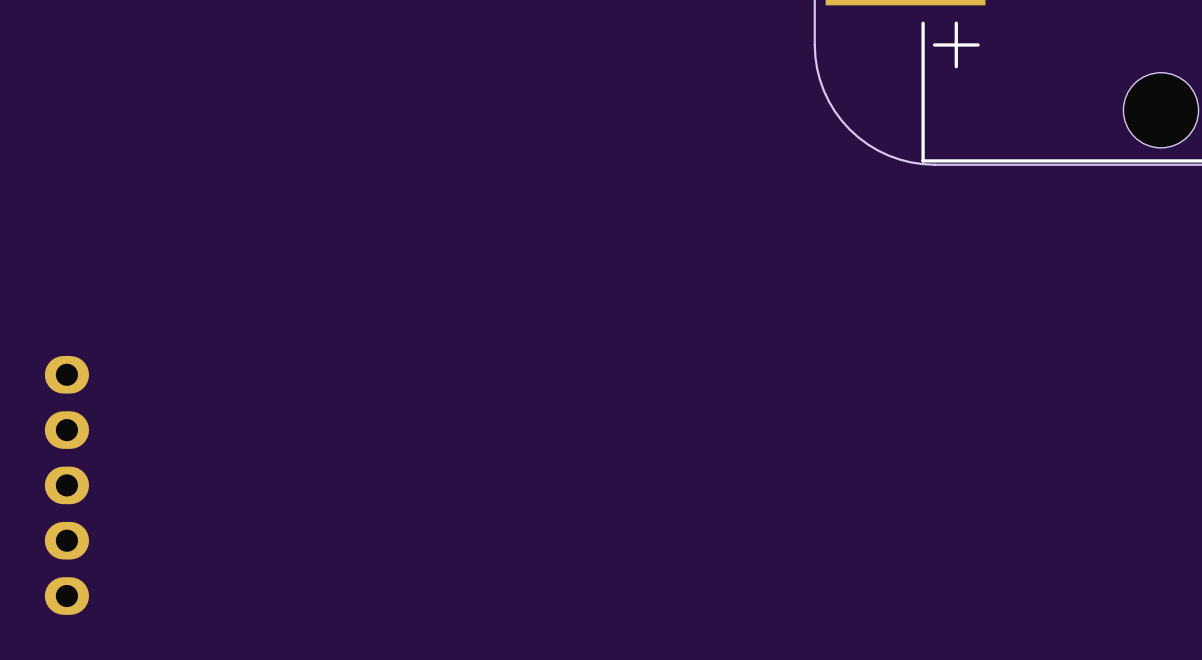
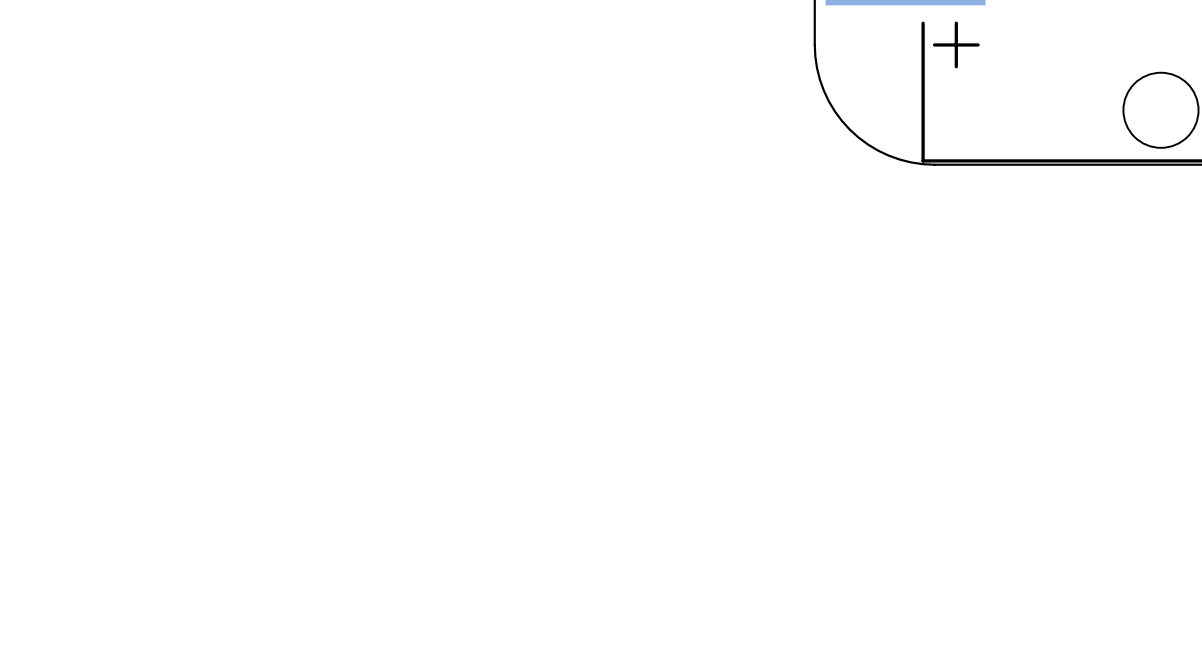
part: (66, 485) -> none

